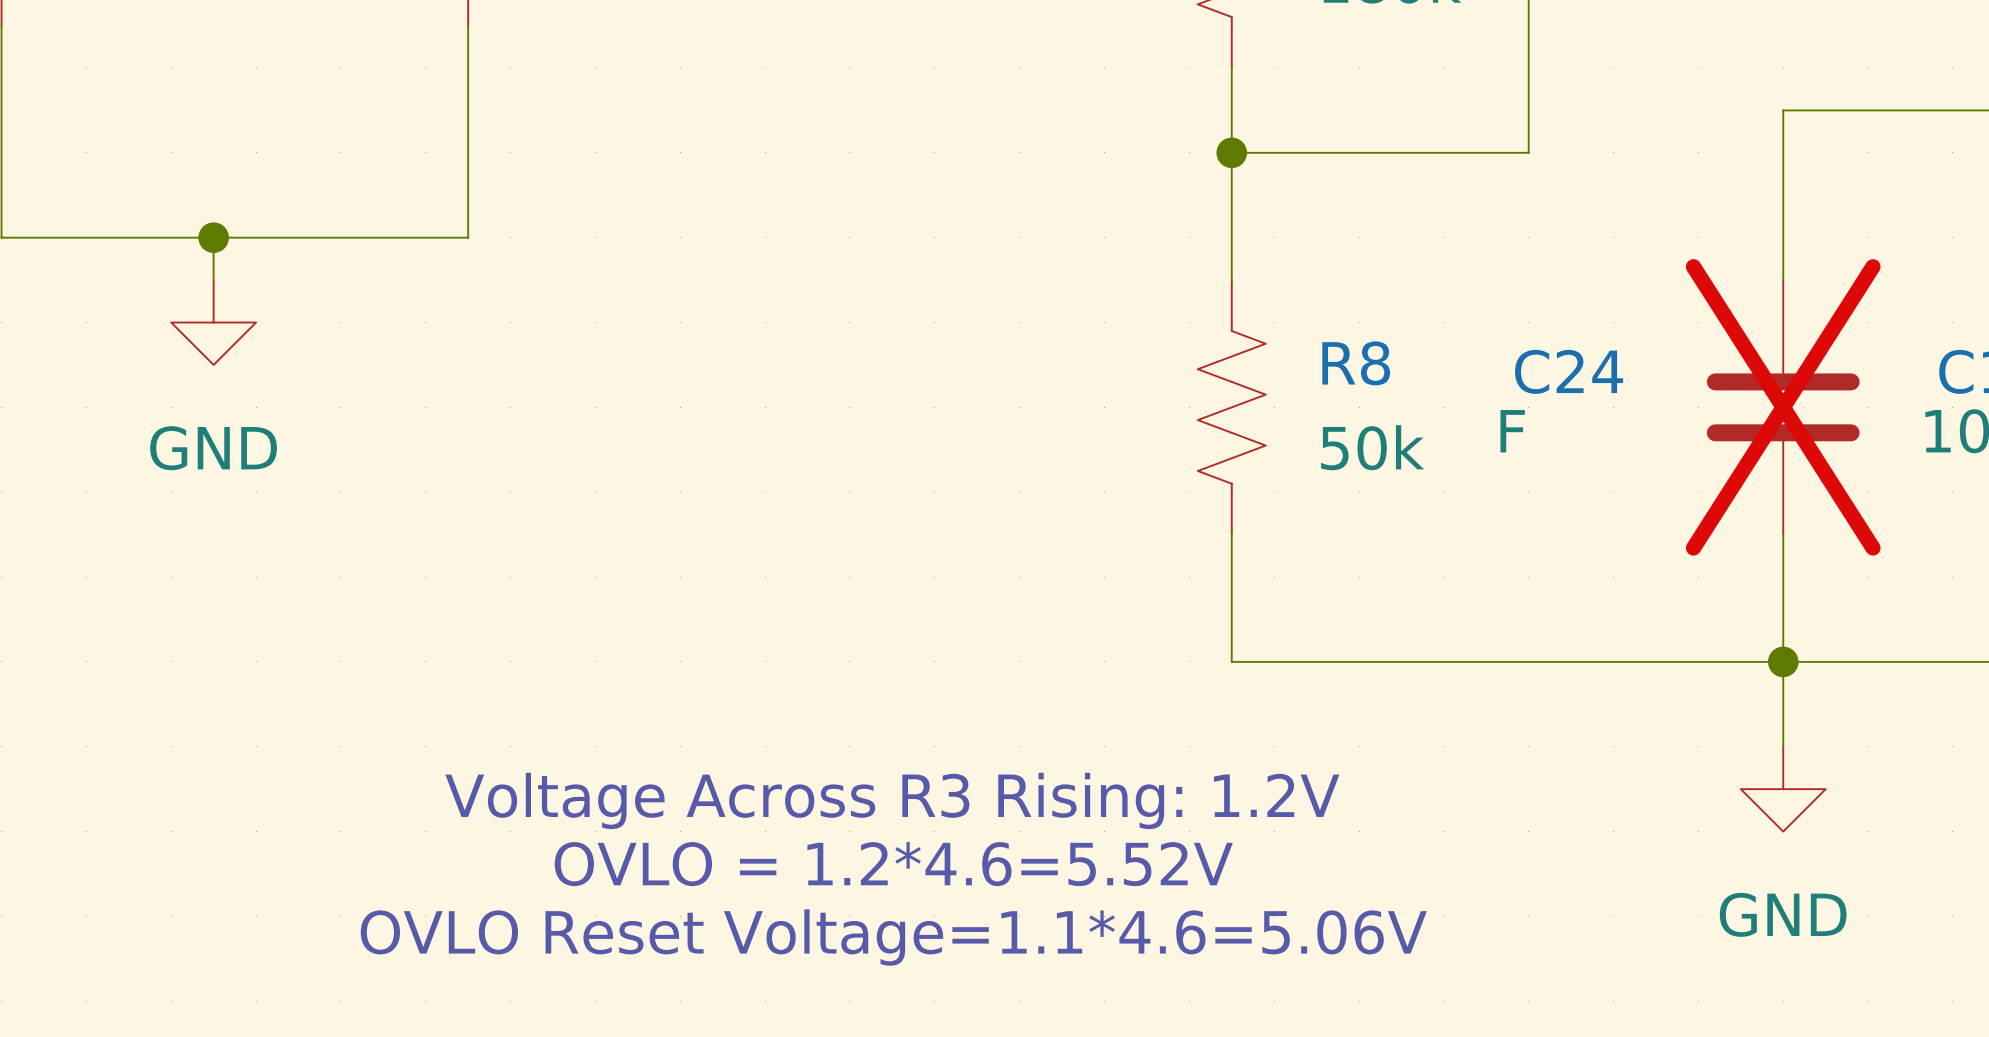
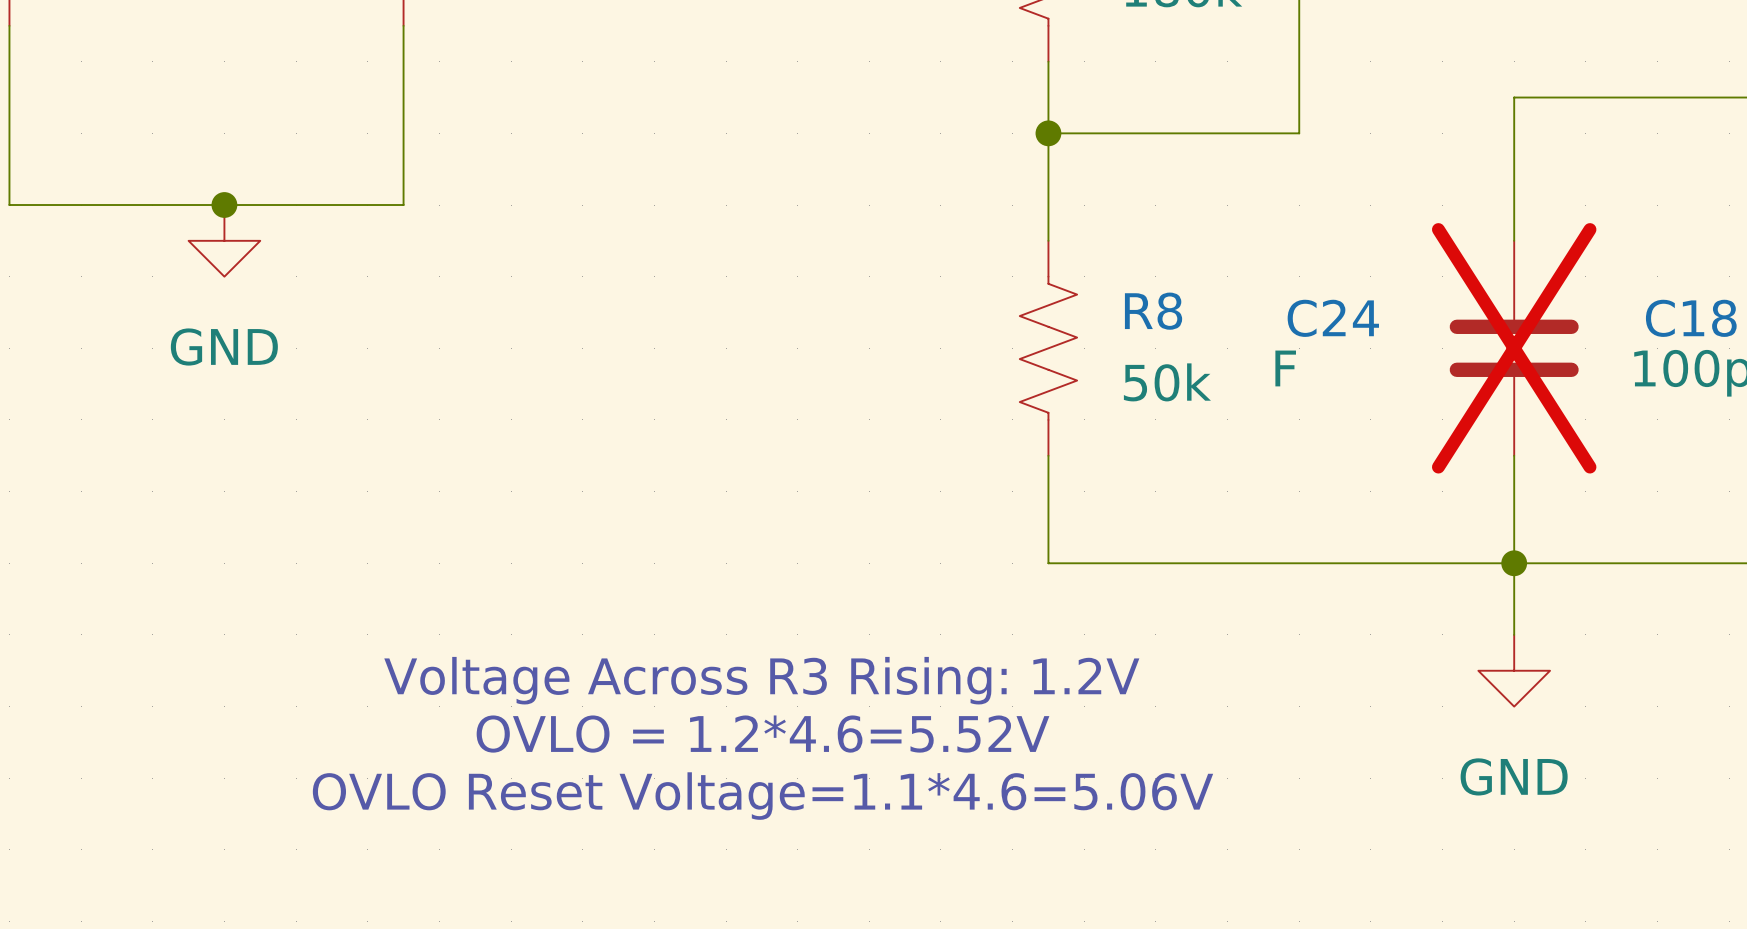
wire: (213, 237) (213, 280) -> none
junction position: (213, 237) -> (224, 205)
power symbol position: GND (213, 322) -> GND (224, 240)

